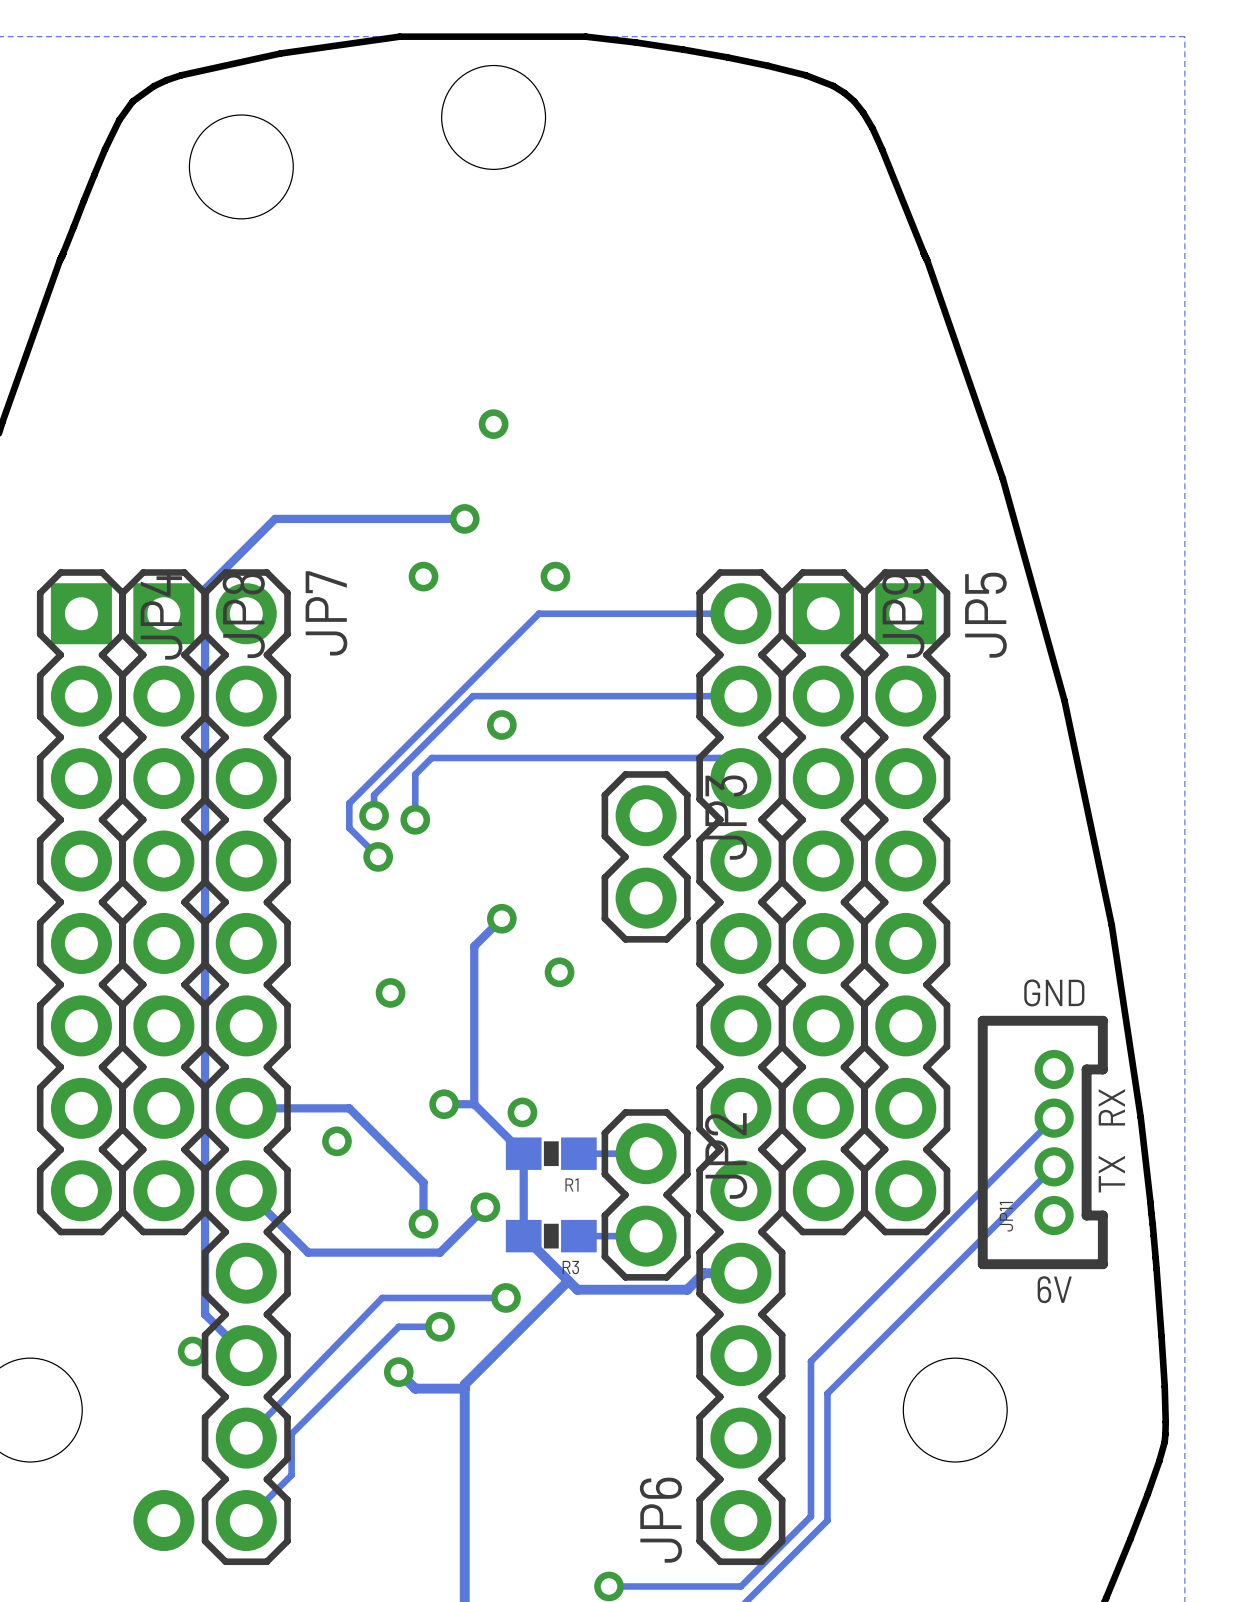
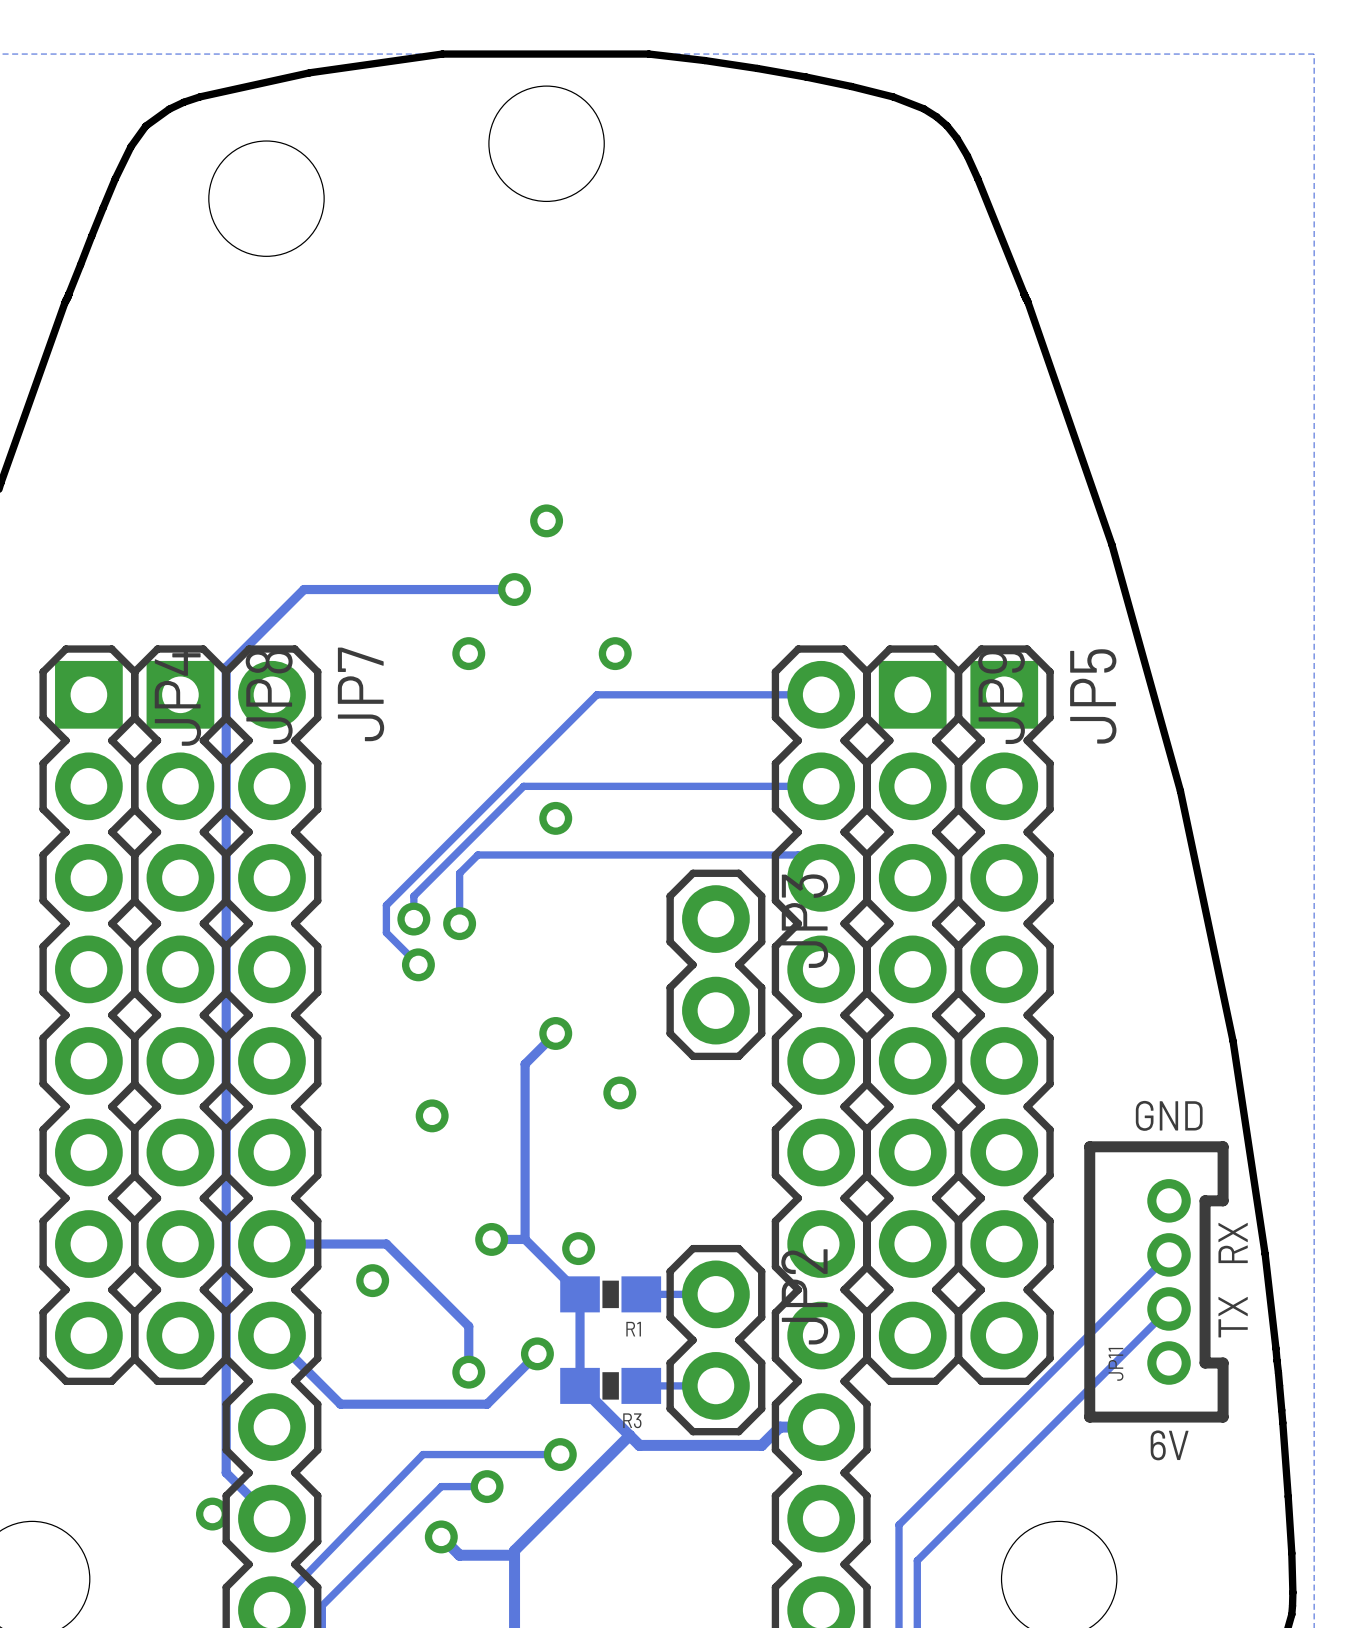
via position: (493, 424) -> (546, 520)

